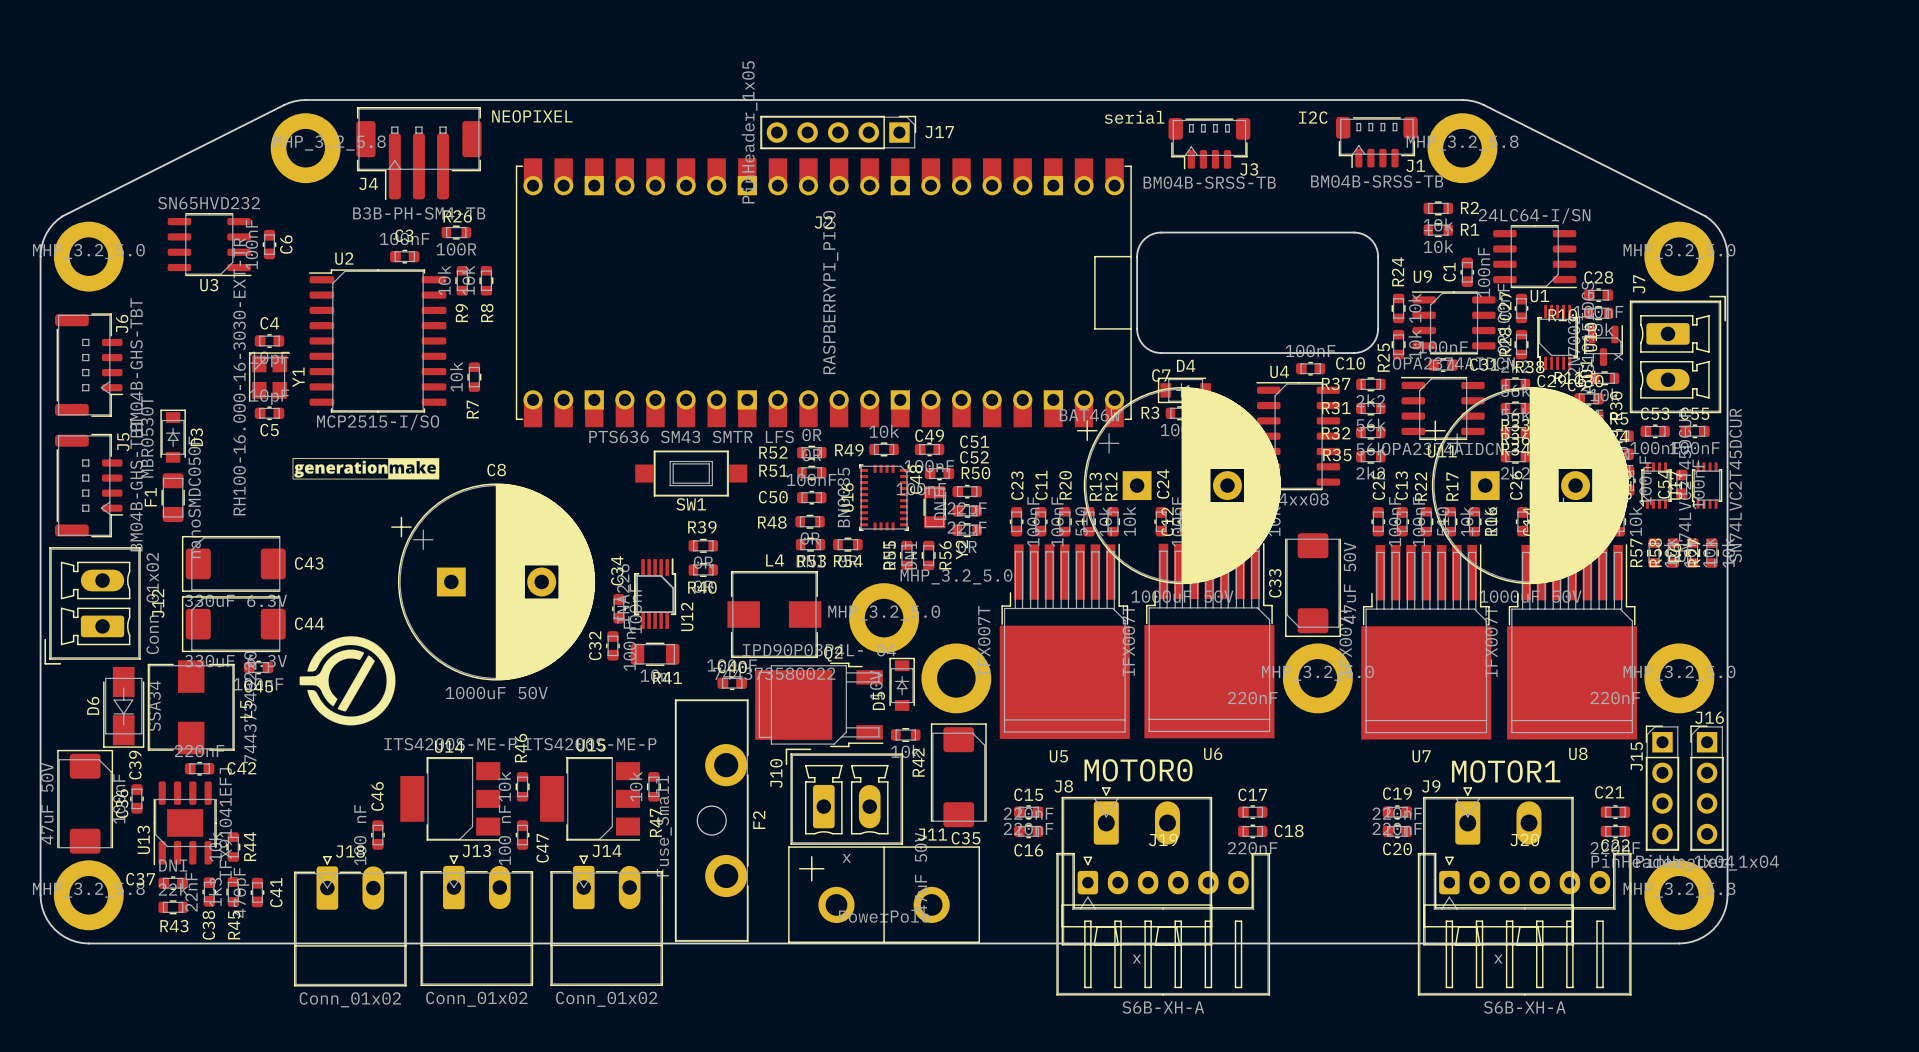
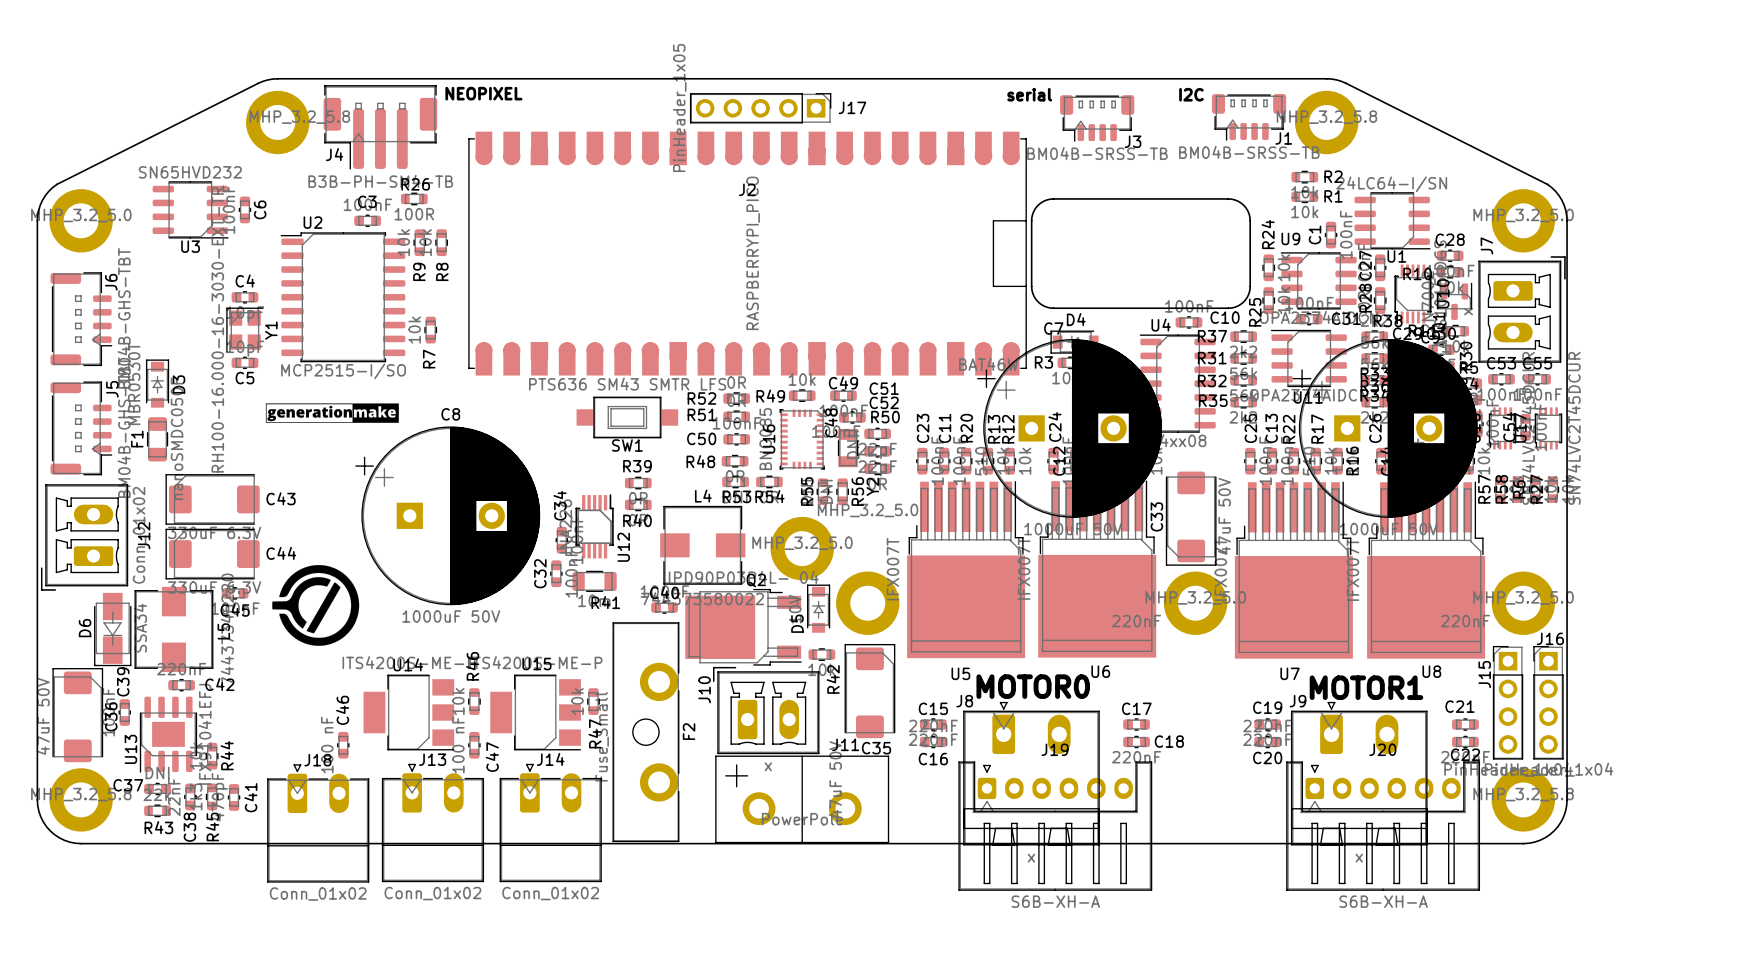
J2 footprint: [515, 158, 1132, 428] -> [468, 131, 1027, 376]

